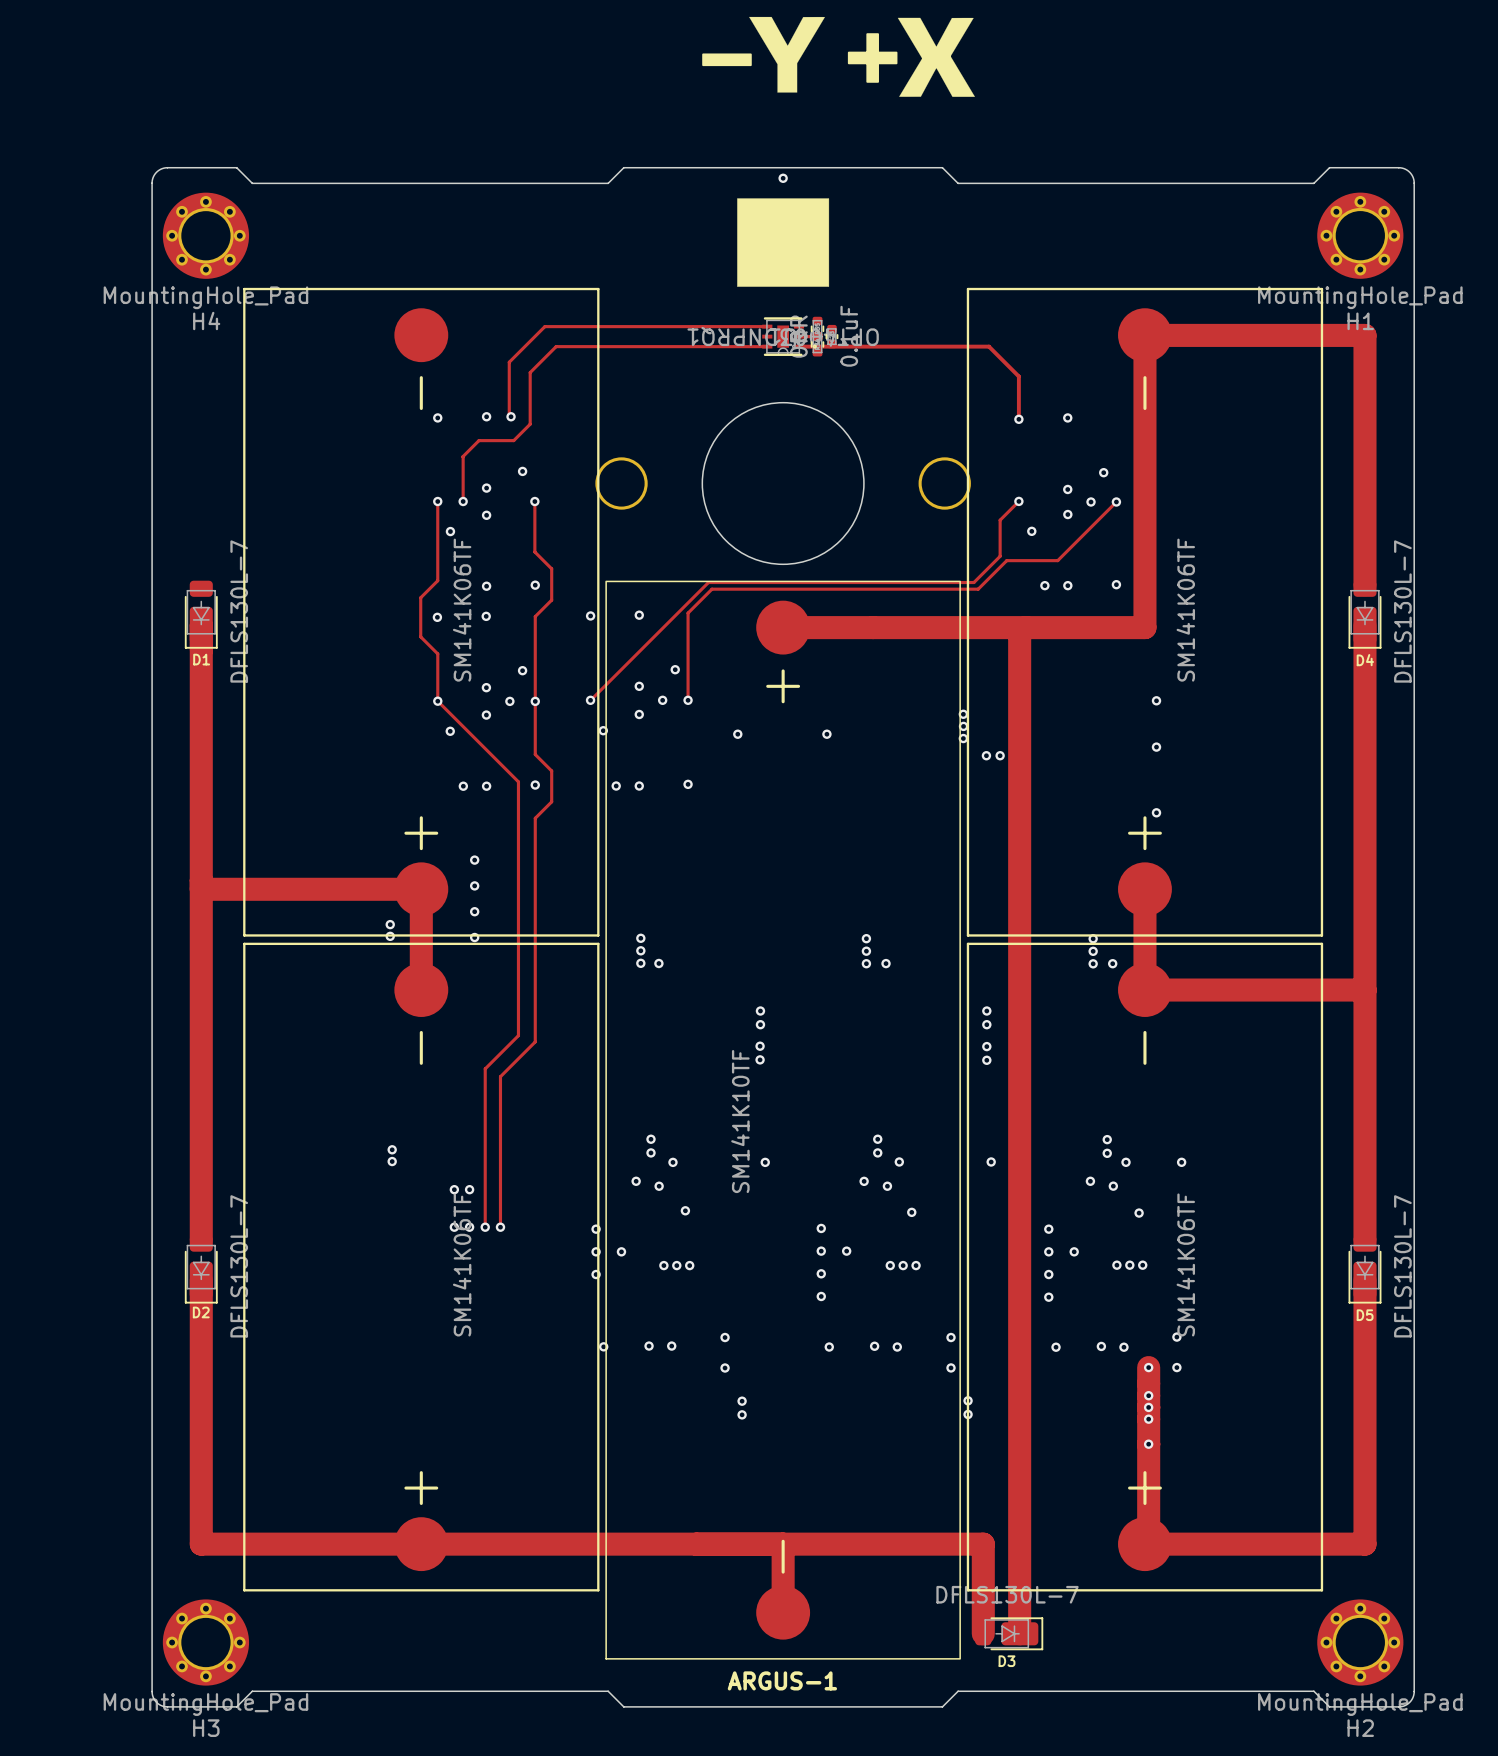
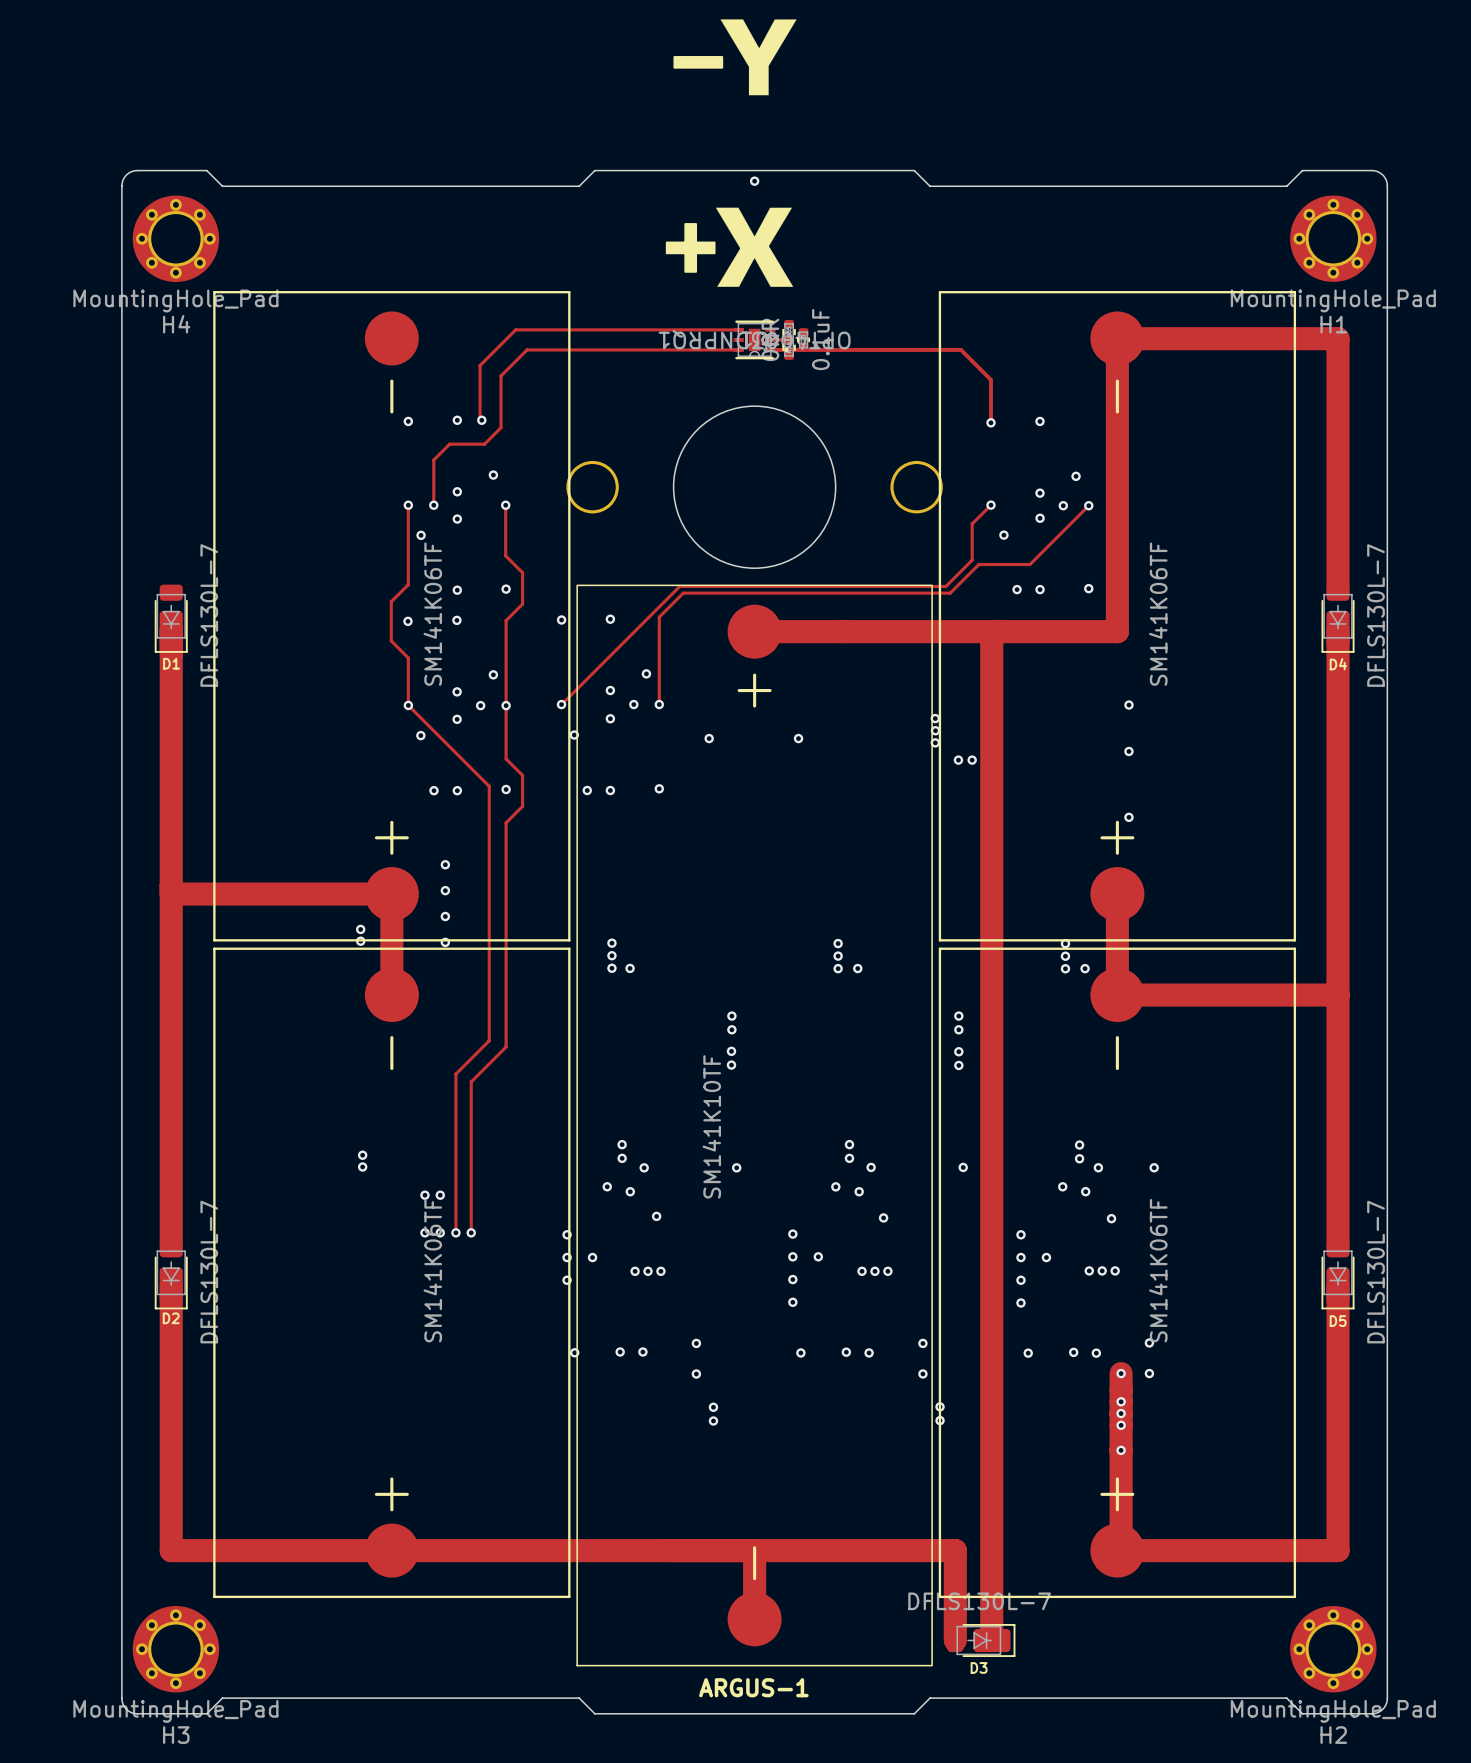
drawing position: (872, 57) -> (690, 247)
drawing position: (911, 57) -> (729, 247)
drawing: [737, 198, 830, 287] -> none

